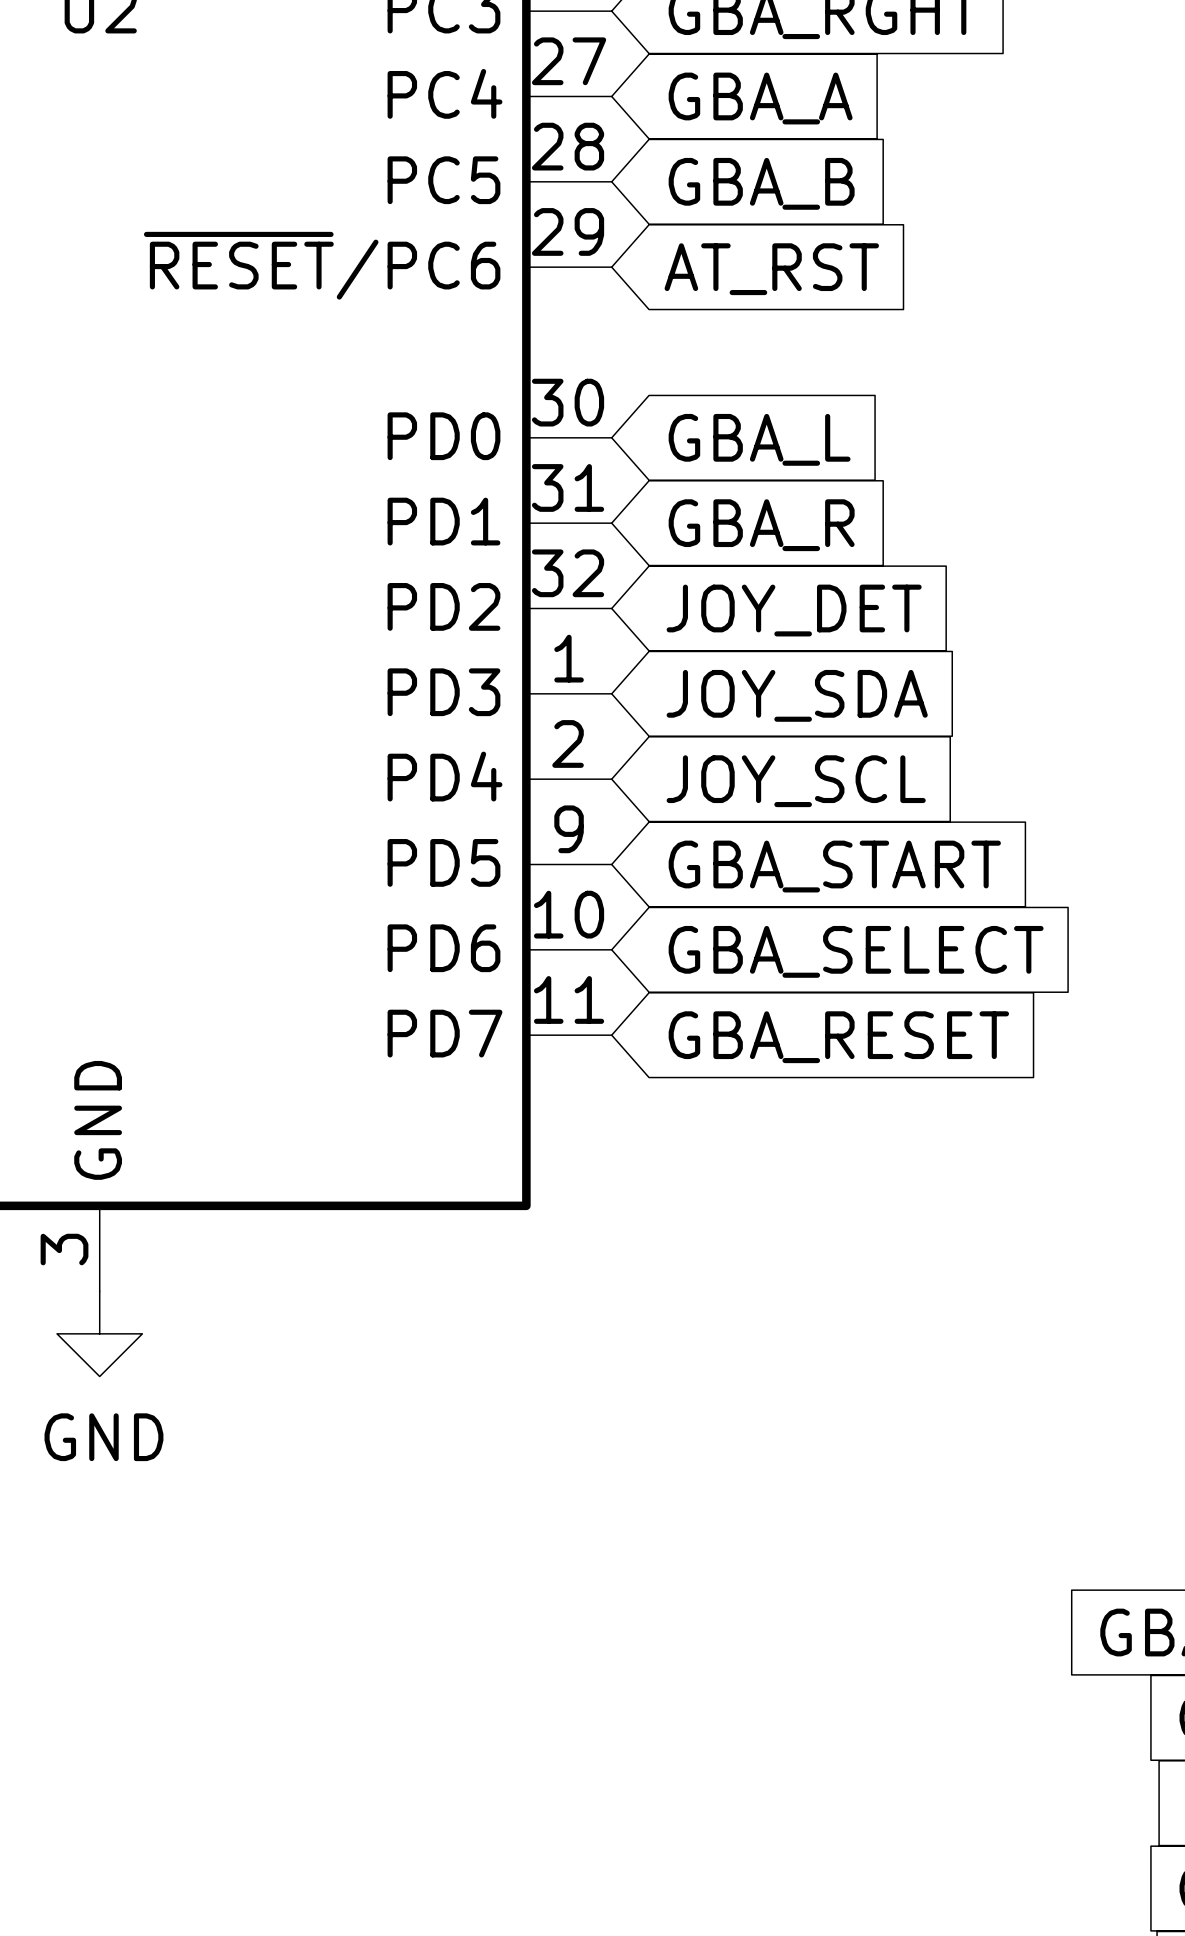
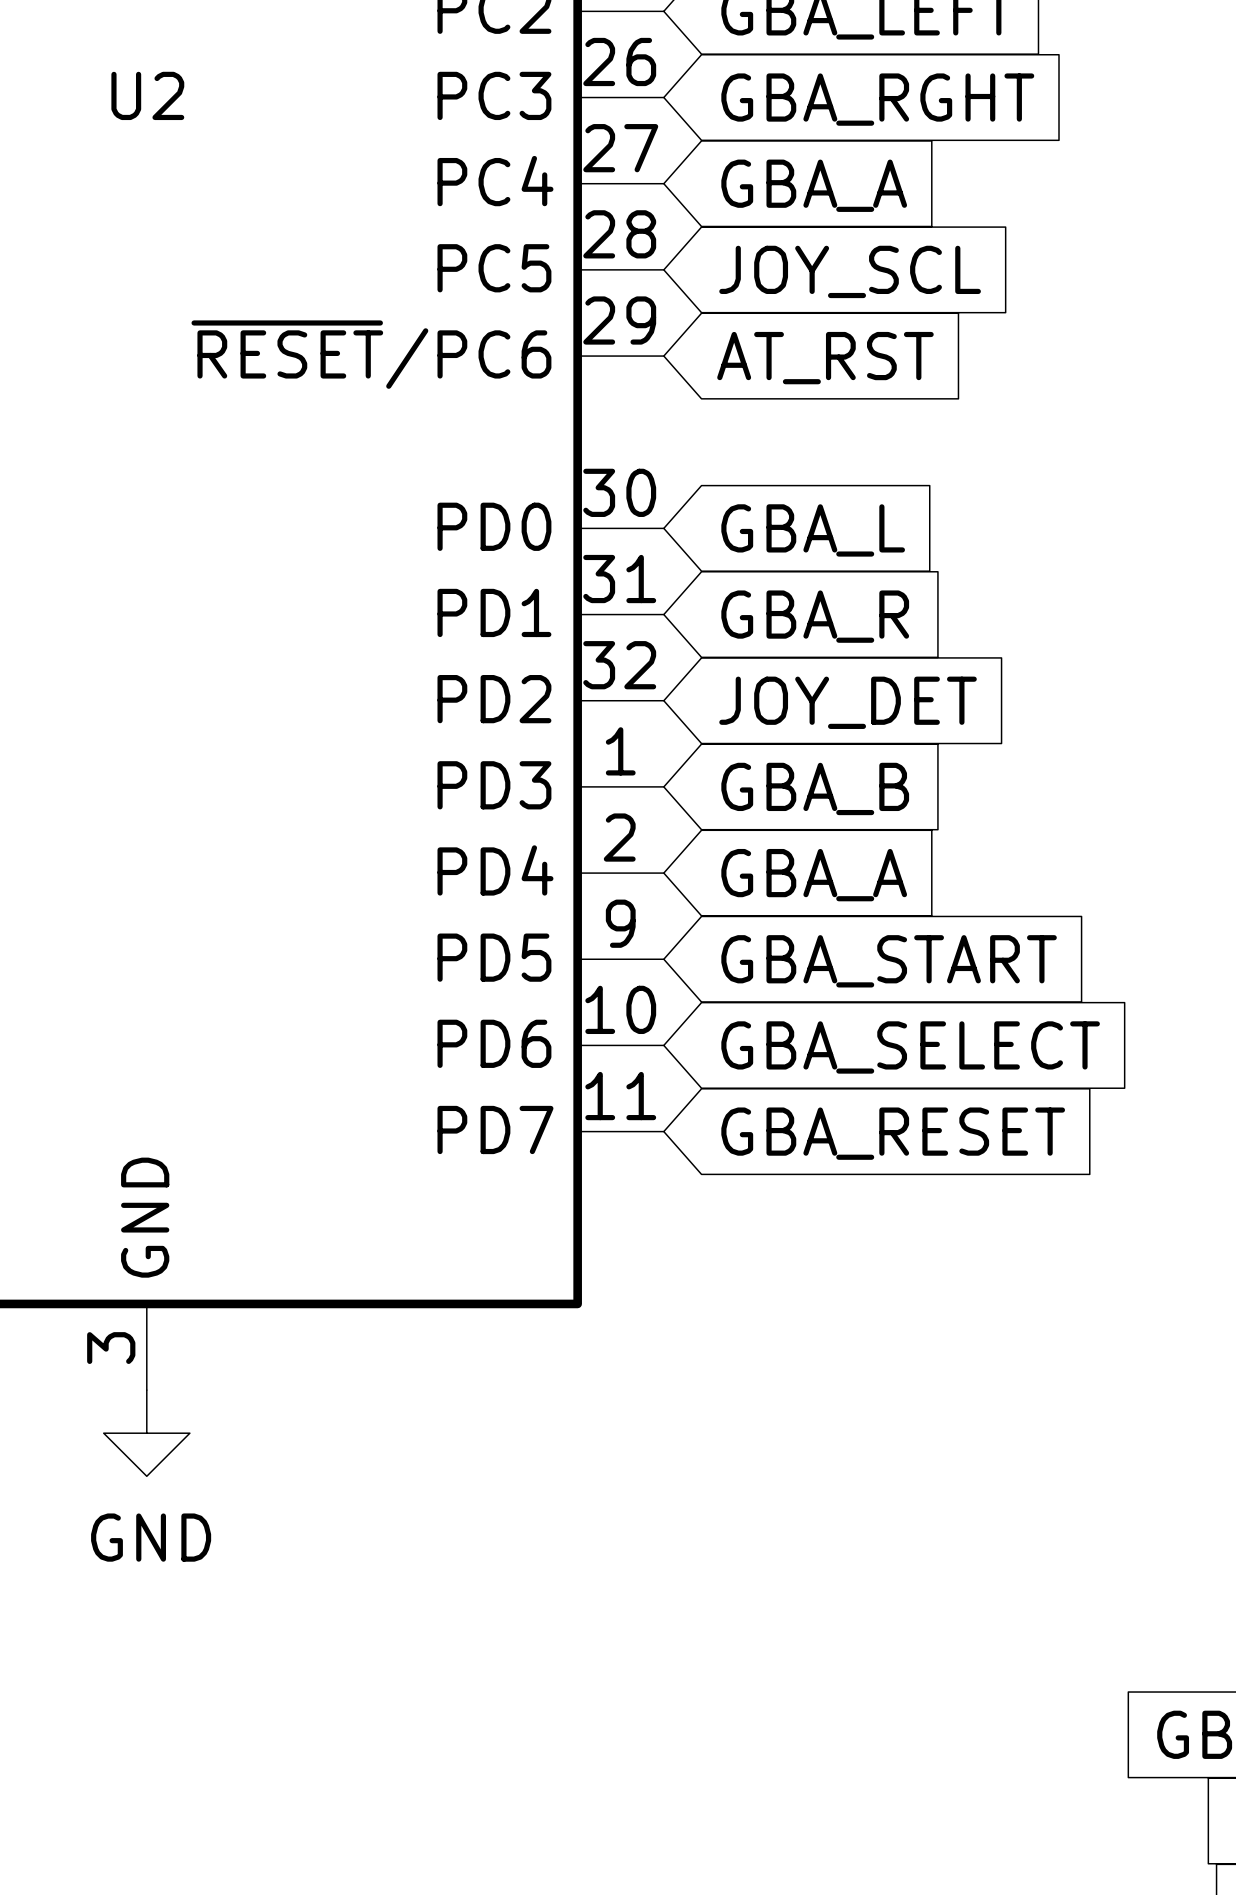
global label: GBA_B (761, 183) -> JOY_SCL (850, 271)
global label: JOY_SDA (797, 695) -> GBA_B (815, 788)
global label: JOY_SCL (796, 781) -> GBA_A (814, 875)

